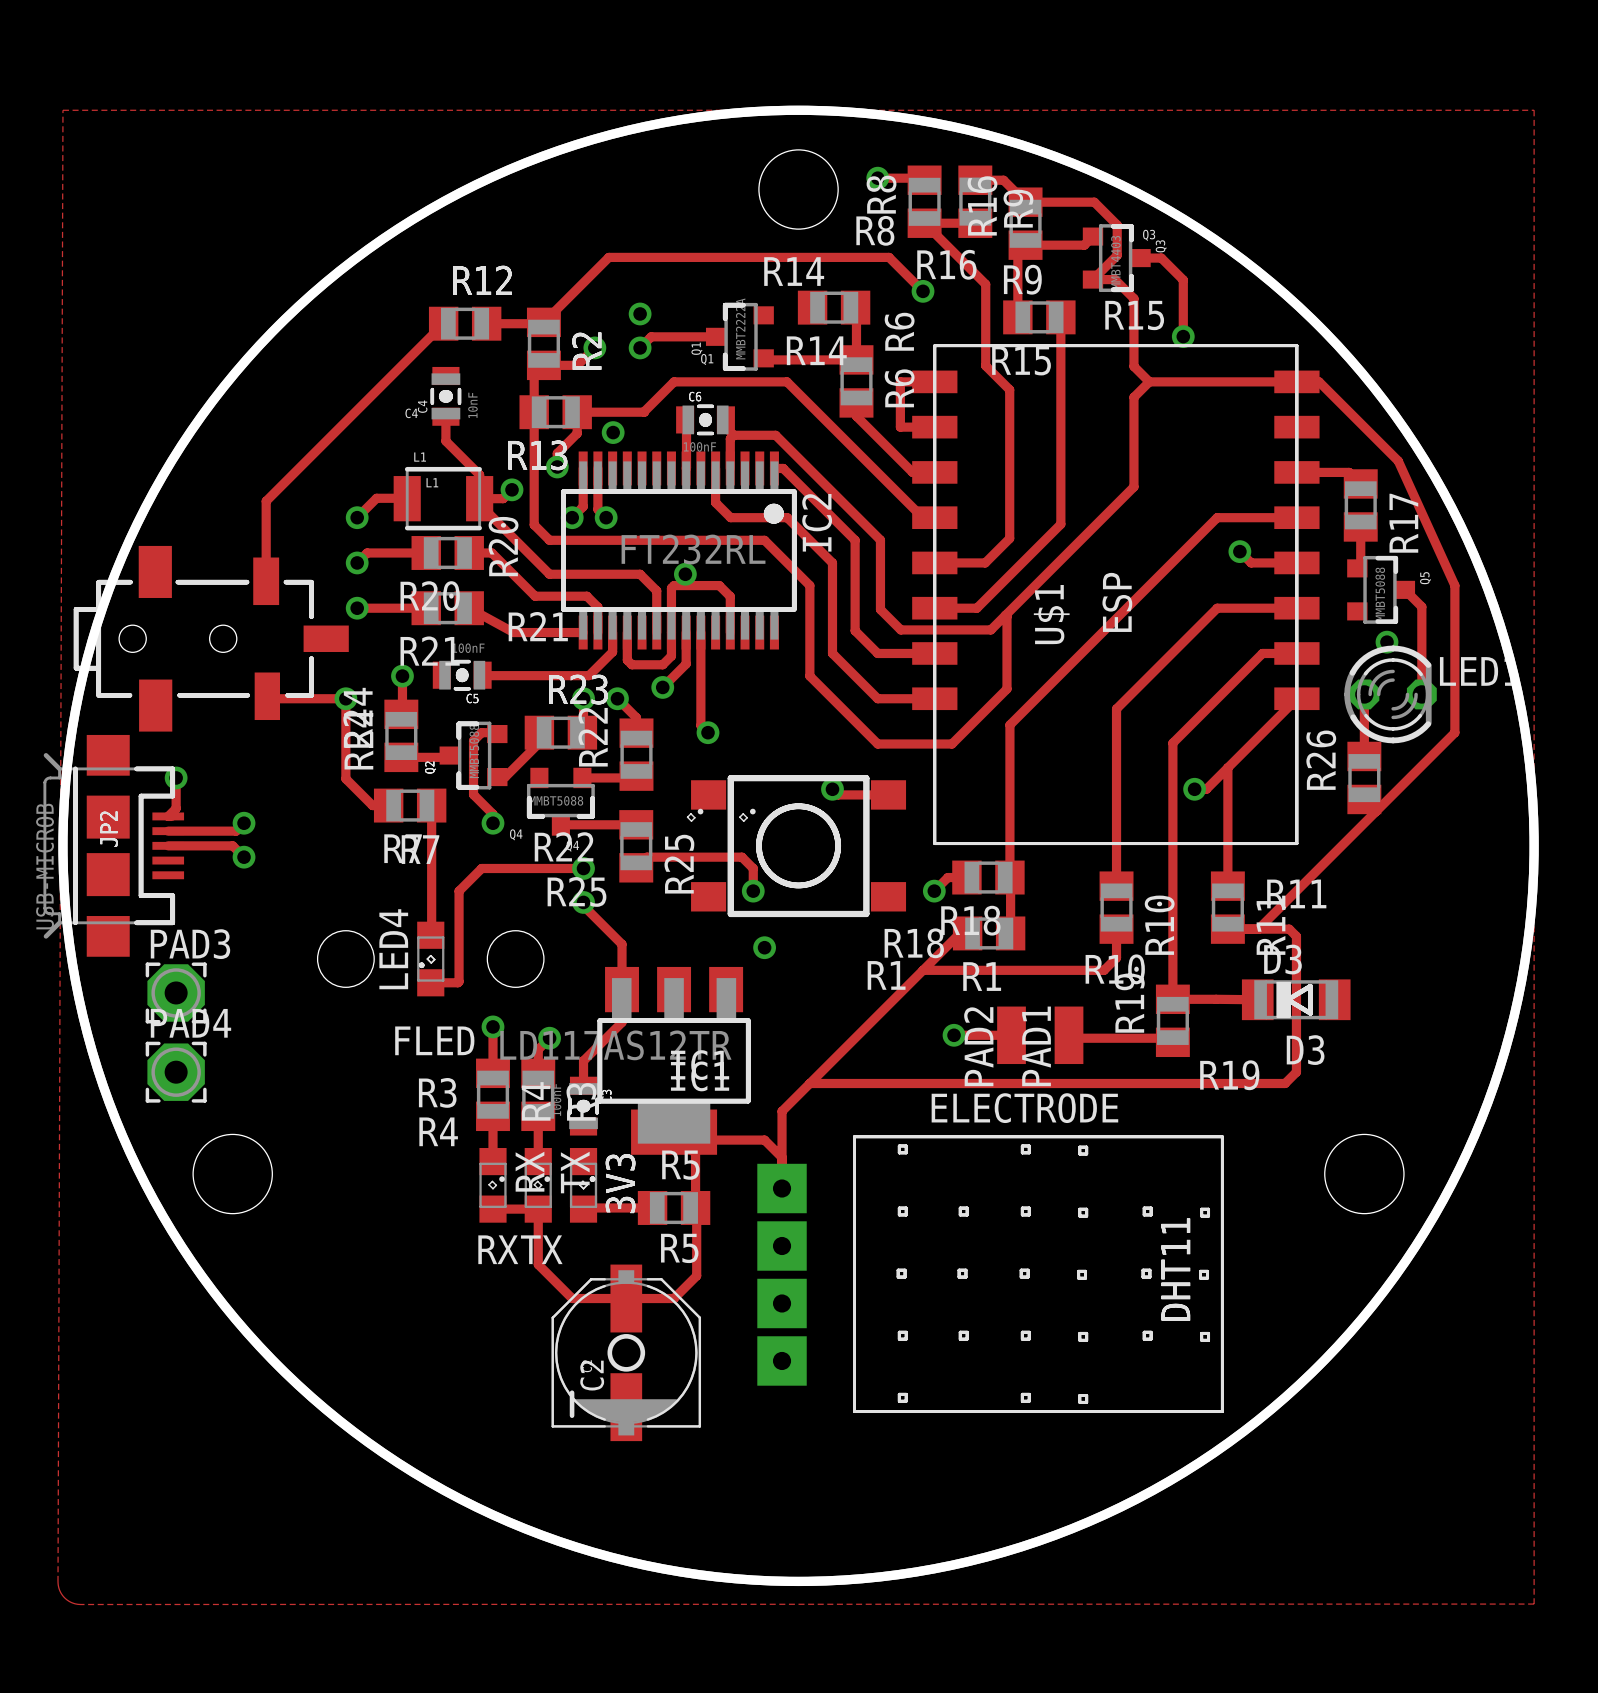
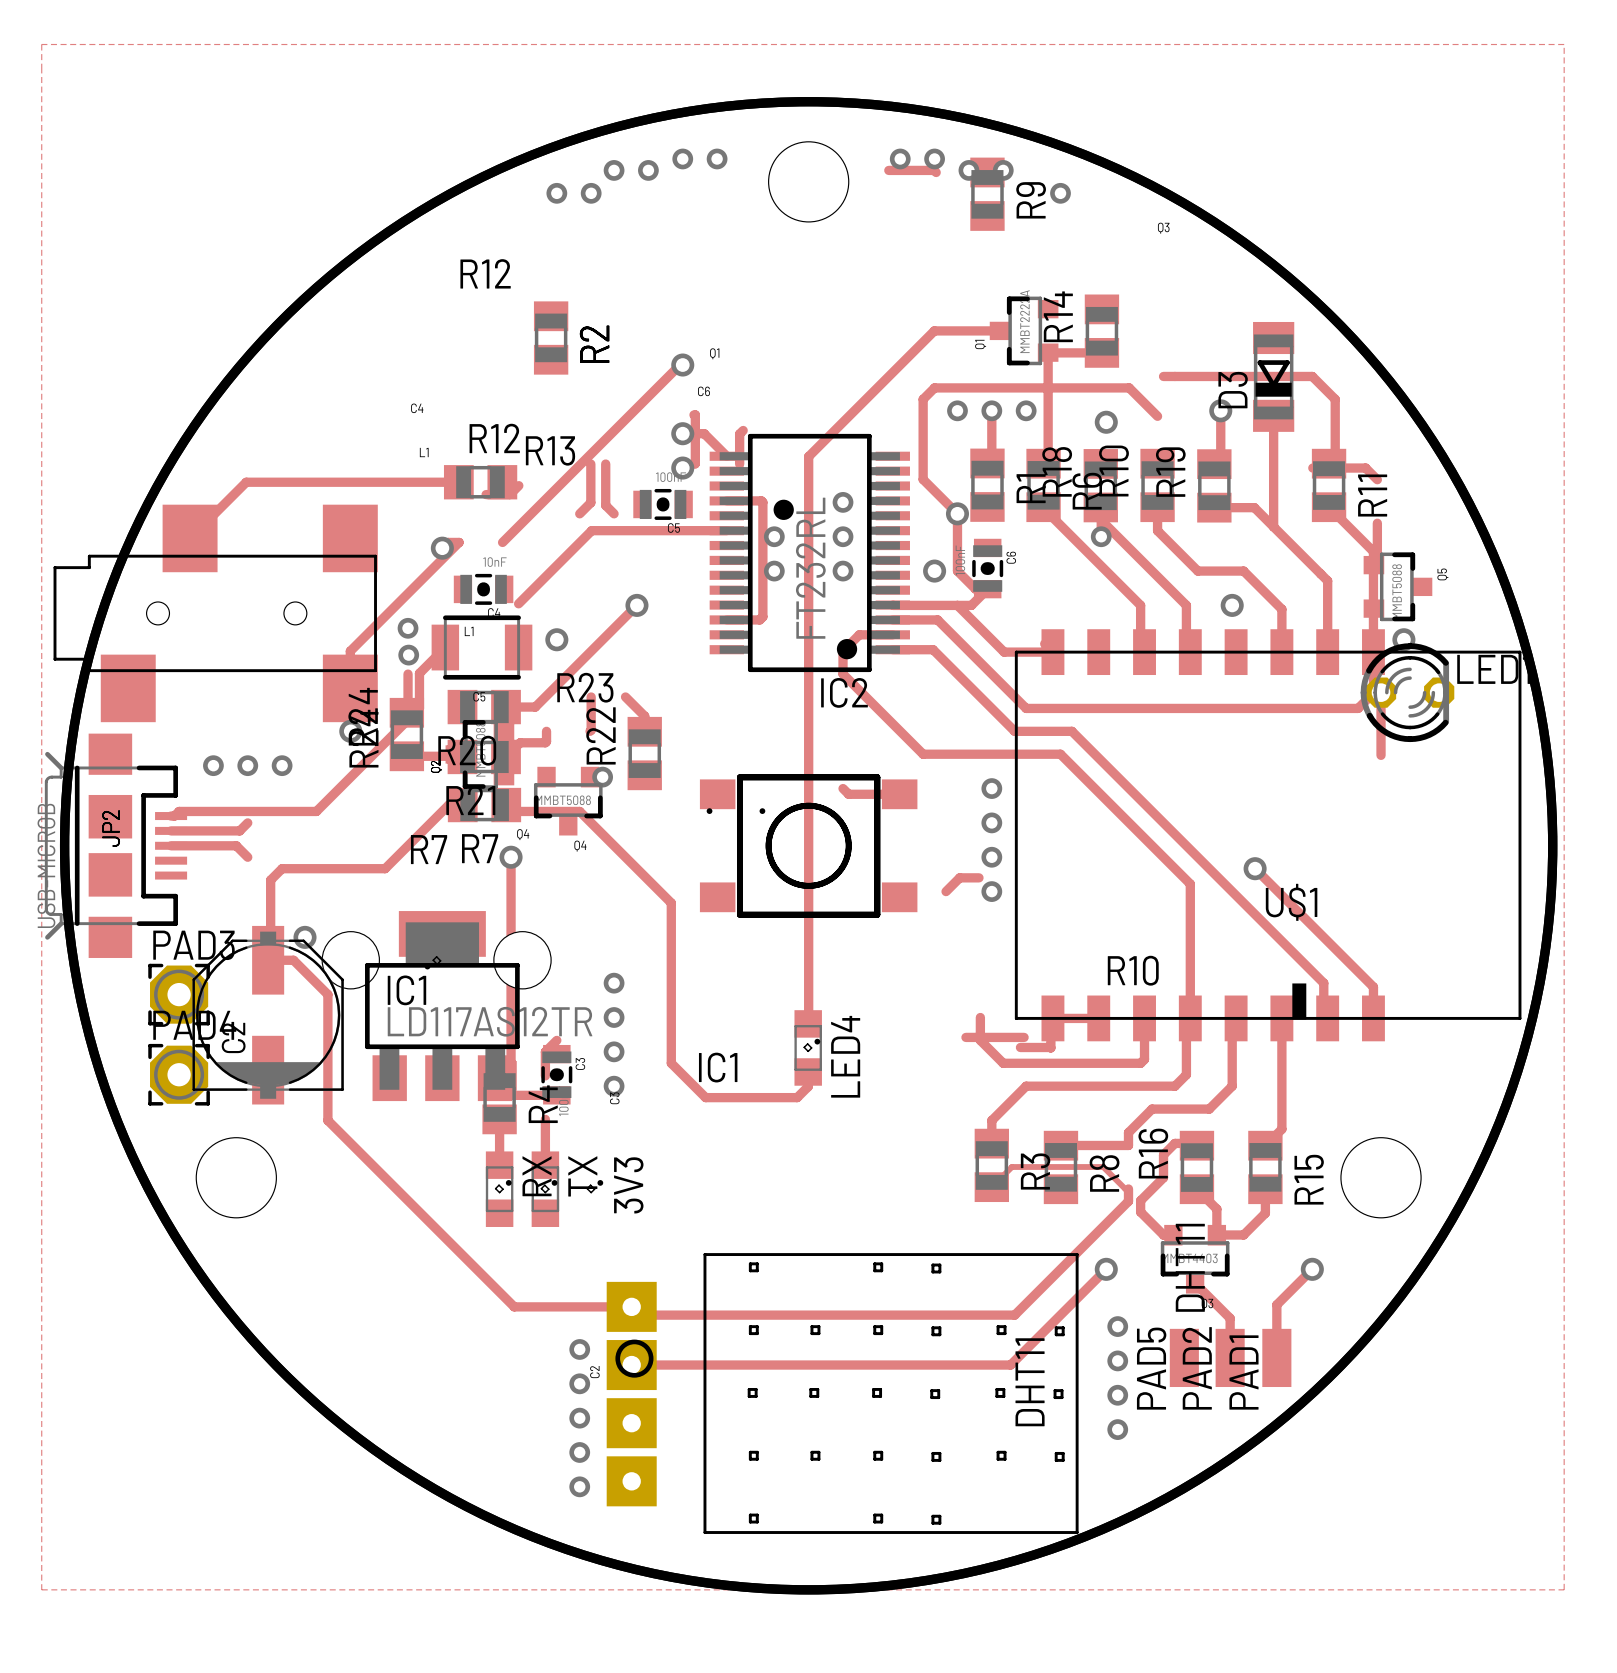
zone outline: (62, 110) (57, 1581) (59, 1590) (64, 1597) (71, 1602) (80, 1604) (1534, 1604) (1534, 110) (62, 110) -> (41, 44) (41, 1589) (1564, 1589) (1564, 44) (41, 44)
via: none -> (682, 158)
via: none -> (717, 158)
via: none -> (934, 158)
via: none -> (614, 170)
via: none -> (648, 170)
via position: (877, 178) -> (900, 158)
via: none -> (968, 170)
via: none -> (1003, 170)
track: (975, 180) (1003, 180) (1025, 202) (1094, 202) (1117, 225) (1117, 255) (1093, 279) (1114, 279) (1133, 298) (1133, 366) (1149, 381) (1133, 397) (1133, 486) (990, 629) (900, 629) (880, 609) (880, 540) (775, 435) (733, 435) (726, 428) (725, 419) -> none
R8 name position: R8 (881, 194) -> R8 (1104, 1173)
via: none -> (556, 193)
via: none -> (591, 193)
via: none -> (1060, 193)
R8 position: (924, 201) -> (1060, 1167)
track: (975, 223) (924, 223) (985, 284) (985, 365) (1009, 389) (1009, 538) (985, 562) (934, 562) -> none
R16 position: (1025, 223) -> (1196, 1167)
line: (1113, 226) (1131, 226) (1131, 239) -> none
text: R8 (875, 230) -> none
track: (1093, 236) (1084, 245) (1025, 245) (1017, 252) (1017, 317) -> none
Q3 rotation: 0° (1116, 258) -> 90° clockwise (1195, 1259)
Q3 position: (1116, 258) -> (1195, 1259)
track: (1140, 258) (1161, 258) (1183, 280) (1183, 336) -> none
text: R16 (946, 264) -> none
text: R14 (794, 271) -> none
line: (1131, 276) (1131, 289) (1113, 289) -> none
text: R9 (1022, 279) -> none
track: (923, 291) (889, 257) (608, 257) (542, 323) (486, 323) -> none
via: (923, 291) -> none
line: (743, 305) (725, 305) (725, 318) -> none
R14 rotation: 0° (834, 307) -> 90° clockwise (1101, 331)
R14 position: (834, 307) -> (1101, 331)
track: (855, 307) (856, 359) (765, 359) (763, 358) -> none
via: (640, 313) -> none
text: R15 (1134, 315) -> none
R15 rotation: 0° (1039, 317) -> 90° clockwise (1265, 1167)
R15 position: (1039, 317) -> (1265, 1167)
track: (1060, 317) (1060, 524) (976, 608) (959, 608) -> (1157, 416) (1129, 387) (934, 387) (923, 399) (923, 479) (957, 513) (957, 571) (975, 589) (987, 589) (971, 605)
track: (443, 323) (266, 501) (266, 581) -> none
R12 position: (465, 323) -> (480, 482)
text: R6 (899, 331) -> none
track: (716, 336) (651, 336) (640, 347) -> none
Q1 position: (739, 336) -> (1024, 330)
track: none -> (1000, 330) (934, 330) (808, 456) (808, 1023)
via: (1183, 336) -> none
line: (934, 345) (934, 843) (1296, 843) (1296, 345) (934, 345) -> none
track: (594, 347) (577, 365) (543, 365) (534, 375) (534, 524) (549, 540) (764, 540) (809, 585) (809, 676) (877, 744) (951, 744) (1006, 689) (1005, 615) -> none
via: (594, 347) -> none
via: (640, 347) -> none
line: (725, 354) (725, 368) (743, 368) -> none
track: none -> (1048, 352) (1048, 459) (1043, 463)
track: none -> (1048, 352) (1101, 352)
R15 name position: R15 (1021, 360) -> R15 (1309, 1179)
track: none -> (682, 365) (680, 365) (502, 542)
via: none -> (682, 365)
R6 position: (856, 381) -> (1043, 485)
track: (934, 381) (900, 381) (900, 427) (934, 427) -> none
track: (1296, 381) (1319, 381) (1398, 461) (1454, 585) (1454, 732) (1258, 929) -> (1312, 376) (1335, 399) (1335, 457) (1329, 463)
line: (432, 389) (432, 403) -> none
line: (459, 389) (459, 403) -> none
line: (445, 396) (446, 396) -> none
C4 rotation: 0° (445, 396) -> 90° clockwise (483, 589)
C4 position: (445, 396) -> (483, 589)
track: (856, 402) (856, 416) (912, 472) (934, 472) -> none
line: (698, 406) (712, 406) -> none
part: (555, 412) -> none
via: none -> (957, 410)
track: none -> (991, 410) (991, 459) (987, 463)
via: none -> (991, 410)
via: none -> (1026, 410)
track: none -> (1220, 410) (1220, 457) (1214, 464)
via: none -> (1220, 410)
track: (445, 416) (445, 441) (479, 474) (479, 504) (549, 574) (640, 574) (656, 590) (656, 632) -> none
line: (705, 419) (705, 420) -> none
C6 rotation: 0° (705, 419) -> 90° clockwise (987, 568)
C6 position: (705, 419) -> (987, 568)
track: none -> (1273, 415) (1273, 526)
via: none -> (1106, 422)
via: (613, 432) -> none
line: (698, 433) (712, 433) -> none
track: none -> (682, 433) (704, 433) (726, 456)
via: none -> (682, 433)
track: (557, 466) (557, 453) (577, 433) (577, 412) (644, 412) (674, 381) (787, 381) (922, 517) (934, 517) -> none
via: (557, 466) -> none
track: (715, 468) (715, 502) (730, 517) (787, 517) (832, 562) (832, 653) (877, 698) (934, 698) -> none
track: (774, 468) (783, 468) (855, 540) (855, 630) (877, 653) (934, 653) -> none
via: none -> (682, 468)
track: none -> (458, 482) (246, 482) (190, 538)
via: (512, 489) -> none
line: (563, 491) (794, 491) (794, 609) (563, 609) (563, 491) -> none
track: (407, 498) (376, 498) (357, 517) -> none
L1 position: (443, 498) -> (481, 647)
track: none -> (726, 500) (762, 502) (762, 616) (759, 619) (726, 619)
R17: (1360, 505) -> none
via: none -> (843, 502)
track: none -> (1043, 507) (1140, 605) (1140, 648) (1144, 652)
track: none -> (1157, 507) (1157, 530) (1197, 571) (1243, 571) (1281, 609) (1281, 652)
track: none -> (1214, 507) (1254, 507) (1327, 580) (1327, 652)
track: none -> (1329, 507) (1373, 551) (1373, 693) (1358, 708) (1026, 708) (937, 619) (892, 619)
via: (357, 517) -> none
via: (572, 517) -> none
via: (606, 517) -> none
via: none -> (957, 513)
track: (1296, 517) (1217, 517) (1009, 724) (1010, 933) -> none
track: none -> (726, 530) (591, 530) (518, 603)
via: none -> (774, 536)
via: none -> (843, 536)
track: none -> (1101, 536) (1101, 507) (1100, 507) (1100, 519) (1186, 605) (1186, 648) (1190, 652)
via: none -> (1101, 536)
text: R20 (503, 546) -> none
IC2 rotation: 0° (678, 550) -> 90° clockwise (809, 552)
track: none -> (442, 548) (448, 542) (459, 542) (350, 651) (350, 731)
via: none -> (442, 548)
track: (1239, 551) (1251, 562) (1296, 562) -> none
via position: (1239, 551) -> (1232, 605)
track: (426, 552) (367, 552) (357, 562) -> none
R20 position: (447, 552) -> (484, 707)
track: (469, 552) (491, 552) (535, 596) (586, 596) (597, 607) (597, 632) -> none
via: (357, 562) -> none
via: (685, 574) -> none
via: none -> (774, 571)
via: none -> (843, 571)
via: none -> (934, 571)
line: (130, 582) (98, 582) (98, 695) (129, 695) -> none
line: (177, 582) (247, 582) -> none
line: (285, 582) (311, 582) (311, 616) -> none
track: (1404, 589) (1421, 606) (1421, 694) -> none
U$1 rotation: 0° (1115, 594) -> 90° counterclockwise (1268, 835)
text: ESP (1117, 602) -> none
track: none -> (892, 605) (946, 605)
track: (357, 608) (426, 608) -> none
via: (357, 608) -> none
R21 position: (447, 608) -> (484, 756)
track: (469, 608) (513, 632) (583, 632) -> none
track: none -> (636, 605) (535, 707) (506, 707)
via: none -> (636, 605)
track: none -> (957, 605) (1004, 652) (1052, 652) (1044, 643)
track: (1296, 608) (1217, 608) (1116, 708) (1116, 886) -> none
line: (98, 609) (76, 609) (76, 668) (98, 668) -> none
part: none -> (215, 613)
text: R21 (538, 626) -> none
via: none -> (408, 628)
track: (612, 632) (612, 652) (588, 675) (482, 675) -> none
track: (627, 632) (627, 660) (631, 664) (662, 664) (671, 656) (671, 588) (674, 585) (719, 585) (730, 596) (730, 632) -> none
track: (686, 632) (686, 664) (662, 687) -> none
track: (700, 632) (700, 725) (708, 732) -> none
part: (211, 638) -> none
via: none -> (556, 639)
track: none -> (445, 647) (419, 673) (419, 708) (316, 811) (179, 811) (174, 816)
track: none -> (892, 649) (933, 649) (1014, 731) (1071, 731) (1323, 983) (1323, 1014) (1327, 1018)
track: (1296, 653) (1262, 653) (1172, 743) (1172, 999) -> none
line: (311, 658) (311, 695) (287, 695) -> none
line: (455, 661) (469, 661) -> none
line: (462, 674) (462, 675) -> none
C5 position: (462, 675) -> (663, 504)
via position: (402, 676) -> (408, 655)
via: (662, 687) -> none
line: (455, 688) (469, 688) -> none
line: (179, 695) (247, 695) -> none
track: (267, 696) (269, 698) (345, 698) (345, 778) (372, 805) (388, 805) -> none
via position: (345, 698) -> (350, 731)
via: (583, 698) -> none
via: (617, 698) -> none
track: (1296, 698) (1206, 789) (1194, 789) -> none
line: (476, 723) (458, 723) (458, 737) -> none
part: (560, 732) -> none
via: (708, 732) -> none
track: (497, 734) (481, 732) (473, 740) (473, 794) (493, 814) (493, 823) -> none
track: (538, 744) (505, 777) (497, 777) -> (545, 742) (520, 742) (506, 756)
via: none -> (213, 765)
via: none -> (247, 765)
via: none -> (282, 765)
track: (1227, 767) (1227, 886) -> none
line: (75, 768) (75, 922) -> none
line: (136, 768) (172, 768) (172, 796) (141, 796) (141, 895) (172, 895) (172, 922) (136, 922) -> none
line: (458, 773) (458, 787) (476, 787) -> none
track: (636, 776) (634, 777) (582, 777) -> none
track: (176, 777) (176, 808) (168, 816) -> none
via: (176, 777) -> none
via: none -> (602, 777)
R26: (1364, 777) -> none
via: (832, 789) -> none
via: none -> (991, 788)
via: (1194, 789) -> none
line: (529, 798) (529, 816) (542, 816) -> none
line: (592, 798) (592, 816) (579, 816) -> none
R7 position: (410, 805) -> (484, 805)
track: (431, 805) (430, 935) -> none
track: none -> (462, 805) (448, 805) (385, 868) (282, 868) (270, 880) (270, 957) (268, 960) (293, 960) (327, 994) (327, 1120) (514, 1306) (631, 1306) (639, 1315) (1014, 1315) (1128, 1201) (1128, 1188) (1125, 1188) (1103, 1167) (1011, 1167) (991, 1187)
track: none -> (506, 805) (512, 811) (579, 811) (671, 903) (671, 1063) (705, 1097) (797, 1097) (808, 1086) (808, 1071)
line: (690, 813) (694, 817) (691, 821) (687, 817) (690, 813) -> none
line: (743, 813) (747, 817) (743, 821) (739, 817) (743, 813) -> none
via: (244, 823) -> none
via position: (493, 823) -> (511, 857)
via: none -> (991, 822)
track: (636, 824) (560, 825) -> none
text: R22 (564, 846) -> none
R25: (636, 846) -> none
via: (244, 857) -> none
track: none -> (511, 857) (511, 1062) (495, 1078) (512, 1095) (556, 1095)
via: none -> (991, 857)
track: (636, 867) (646, 857) (741, 857) (753, 868) (753, 891) -> none
track: (583, 868) (481, 868) (459, 891) (459, 981) (430, 982) -> none
via: (583, 868) -> none
track: none -> (1255, 868) (1373, 987) (1373, 1018)
via: none -> (1255, 868)
R18 rotation: 0° (988, 877) -> 90° clockwise (1100, 485)
R18 position: (988, 877) -> (1100, 485)
text: R25 (576, 891) -> none
via: (753, 891) -> none
via: (934, 891) -> none
via: none -> (991, 891)
text: R11 (1296, 893) -> none
track: (583, 902) (583, 905) (622, 944) (622, 1022) (583, 1060) (583, 1085) -> none
via: (583, 902) -> none
R10 position: (1116, 907) -> (1157, 485)
R11 position: (1227, 907) -> (1329, 485)
R10 name position: R10 (1159, 925) -> R10 (1113, 471)
track: (1116, 929) (1116, 957) (1104, 970) (923, 970) -> none
track: (1227, 929) (1289, 929) (1296, 936) (1296, 1072) (1285, 1083) (1160, 1083) -> (892, 634) (859, 634) (843, 651) (843, 674) (923, 754) (1060, 754) (1190, 884) (1190, 1018) (1186, 1022) (1186, 1074) (1174, 1086)
track: (967, 933) (959, 933) (782, 1111) (782, 1188) -> none
R1 rotation: 0° (989, 933) -> 90° clockwise (987, 485)
R1 position: (989, 933) -> (987, 485)
via: none -> (305, 937)
text: R18 (914, 943) -> none
via: (764, 947) -> none
LED4 rotation: 0° (430, 959) -> 180° (808, 1047)
LED4 position: (430, 959) -> (808, 1047)
text: R1 (886, 975) -> none
R1 name position: R1 (982, 976) -> R1 (1031, 488)
via: none -> (614, 983)
line: (1310, 986) (1287, 999) (1310, 1013) (1310, 986) -> none
track: (1172, 999) (1257, 999) -> none
D3 rotation: 0° (1296, 999) -> 90° counterclockwise (1273, 376)
D3 position: (1296, 999) -> (1273, 376)
via: none -> (614, 1017)
track: none -> (980, 1017) (980, 1040) (1003, 1063) (1140, 1063) (1144, 1059) (1144, 1018)
track: none -> (1098, 1018) (1052, 1018) (1050, 1020) (1050, 1047) (1020, 1047)
track: none -> (1236, 1018) (1232, 1022) (1232, 1086) (1209, 1109) (1152, 1109) (1128, 1132) (1128, 1145) (1061, 1145)
track: none -> (1281, 1018) (1281, 1129) (1265, 1145)
line: (599, 1020) (599, 1101) (748, 1101) (748, 1020) (599, 1020) -> none
R19 position: (1172, 1020) -> (1214, 485)
track: (493, 1026) (493, 1073) -> none
via: (493, 1026) -> none
via: (954, 1035) -> none
PAD2 position: (1011, 1035) -> (1230, 1357)
track: (1069, 1035) (1071, 1038) (1168, 1038) (1172, 1042) -> none
PAD1 position: (1069, 1035) -> (1276, 1357)
via: (549, 1038) -> none
text: FLED (434, 1040) -> none
via: none -> (614, 1051)
text: D3 (1305, 1050) -> none
IC1 rotation: 0° (674, 1060) -> 180° (442, 1006)
IC1 position: (674, 1060) -> (442, 1006)
text: R19 (1229, 1075) -> none
via: none -> (614, 1086)
track: (809, 1083) (1013, 1083) -> (991, 1143) (991, 1120) (1026, 1086)
text: R3 (437, 1092) -> none
R3 position: (538, 1094) -> (991, 1165)
line: (569, 1099) (569, 1112) -> none
line: (597, 1099) (597, 1112) -> none
line: (582, 1106) (584, 1106) -> none
C3 position: (583, 1106) -> (556, 1074)
text: ELECTRODE (1024, 1108) -> none
text: R4 (438, 1131) -> none
track: (674, 1132) (695, 1153) (696, 1207) (696, 1275) (674, 1298) (572, 1298) (538, 1264) (538, 1209) (493, 1209) -> none
line: (854, 1136) (854, 1411) (1222, 1411) (1222, 1136) (854, 1136) -> none
track: (683, 1141) (685, 1140) (764, 1140) (782, 1157) -> none
track: none -> (1196, 1145) (1194, 1143) (1174, 1143) (1163, 1154) (1163, 1177) (1140, 1200) (1140, 1212) (1163, 1235) (1173, 1235)
line: (899, 1145) (906, 1145) (906, 1152) (899, 1152) (899, 1145) -> none
line: (1022, 1145) (1022, 1152) (1029, 1152) (1029, 1145) (1022, 1145) -> none
line: (1079, 1147) (1079, 1154) (1086, 1154) (1086, 1147) (1079, 1147) -> none
part: (583, 1185) -> none
track: none -> (1196, 1189) (1216, 1209) (1216, 1235)
track: none -> (1265, 1189) (1265, 1213) (1243, 1234) (1217, 1234)
track: (652, 1207) (583, 1209) -> none
R5: (674, 1207) -> none
line: (899, 1208) (906, 1208) (906, 1214) (899, 1214) (899, 1208) -> none
line: (960, 1208) (967, 1208) (967, 1214) (960, 1214) (960, 1208) -> none
line: (1022, 1208) (1022, 1214) (1029, 1214) (1029, 1208) (1022, 1208) -> none
line: (1144, 1208) (1151, 1208) (1151, 1214) (1144, 1214) (1144, 1208) -> none
line: (1079, 1209) (1079, 1216) (1086, 1216) (1086, 1209) (1079, 1209) -> none
line: (1201, 1209) (1208, 1209) (1208, 1216) (1201, 1216) (1201, 1209) -> none
text: R5 (679, 1248) -> none
text: RX (498, 1249) -> none
text: TX (541, 1249) -> none
track: none -> (1106, 1269) (1010, 1365) (631, 1365)
via: none -> (1106, 1269)
track: none -> (1312, 1269) (1276, 1304) (1276, 1357)
via: none -> (1312, 1269)
line: (898, 1270) (905, 1270) (905, 1277) (898, 1277) (898, 1270) -> none
line: (959, 1270) (965, 1270) (965, 1277) (959, 1277) (959, 1270) -> none
line: (1021, 1270) (1021, 1277) (1028, 1277) (1028, 1270) (1021, 1270) -> none
line: (1143, 1270) (1149, 1270) (1149, 1277) (1143, 1277) (1143, 1270) -> none
line: (1078, 1271) (1078, 1278) (1085, 1278) (1085, 1271) (1078, 1271) -> none
line: (1200, 1271) (1207, 1271) (1207, 1278) (1200, 1278) (1200, 1271) -> none
part position: (990, 1274) -> (842, 1393)
track: none -> (1195, 1283) (1230, 1318) (1230, 1357)
via: none -> (1117, 1326)
line: (899, 1332) (906, 1332) (906, 1339) (899, 1339) (899, 1332) -> none
line: (960, 1332) (967, 1332) (967, 1339) (960, 1339) (960, 1332) -> none
line: (1022, 1332) (1022, 1339) (1029, 1339) (1029, 1332) (1022, 1332) -> none
line: (1144, 1332) (1151, 1332) (1151, 1339) (1144, 1339) (1144, 1332) -> none
line: (1079, 1333) (1079, 1340) (1086, 1340) (1086, 1333) (1079, 1333) -> none
line: (1201, 1333) (1208, 1333) (1208, 1340) (1201, 1340) (1201, 1333) -> none
via: none -> (579, 1349)
C2 position: (626, 1352) -> (268, 1015)
PAD5: none -> (1184, 1357)
via: none -> (1117, 1360)
via: none -> (579, 1383)
via: none -> (1117, 1395)
line: (572, 1392) (572, 1415) -> none
line: (899, 1394) (906, 1394) (906, 1401) (899, 1401) (899, 1394) -> none
line: (1022, 1394) (1022, 1401) (1029, 1401) (1029, 1394) (1022, 1394) -> none
line: (1079, 1395) (1079, 1402) (1086, 1402) (1086, 1395) (1079, 1395) -> none
via: none -> (579, 1418)
via: none -> (1117, 1429)
via: none -> (579, 1452)
via: none -> (579, 1486)

